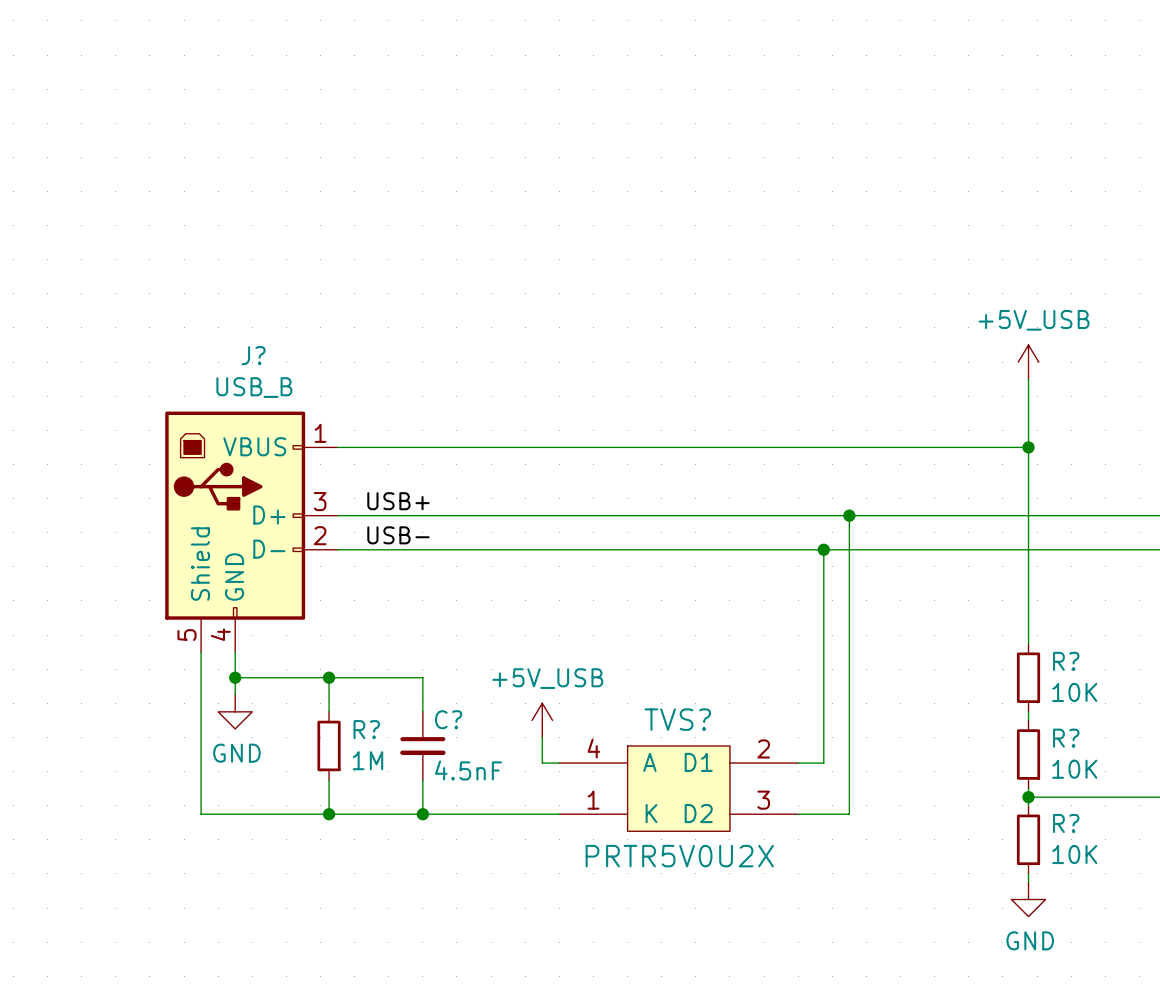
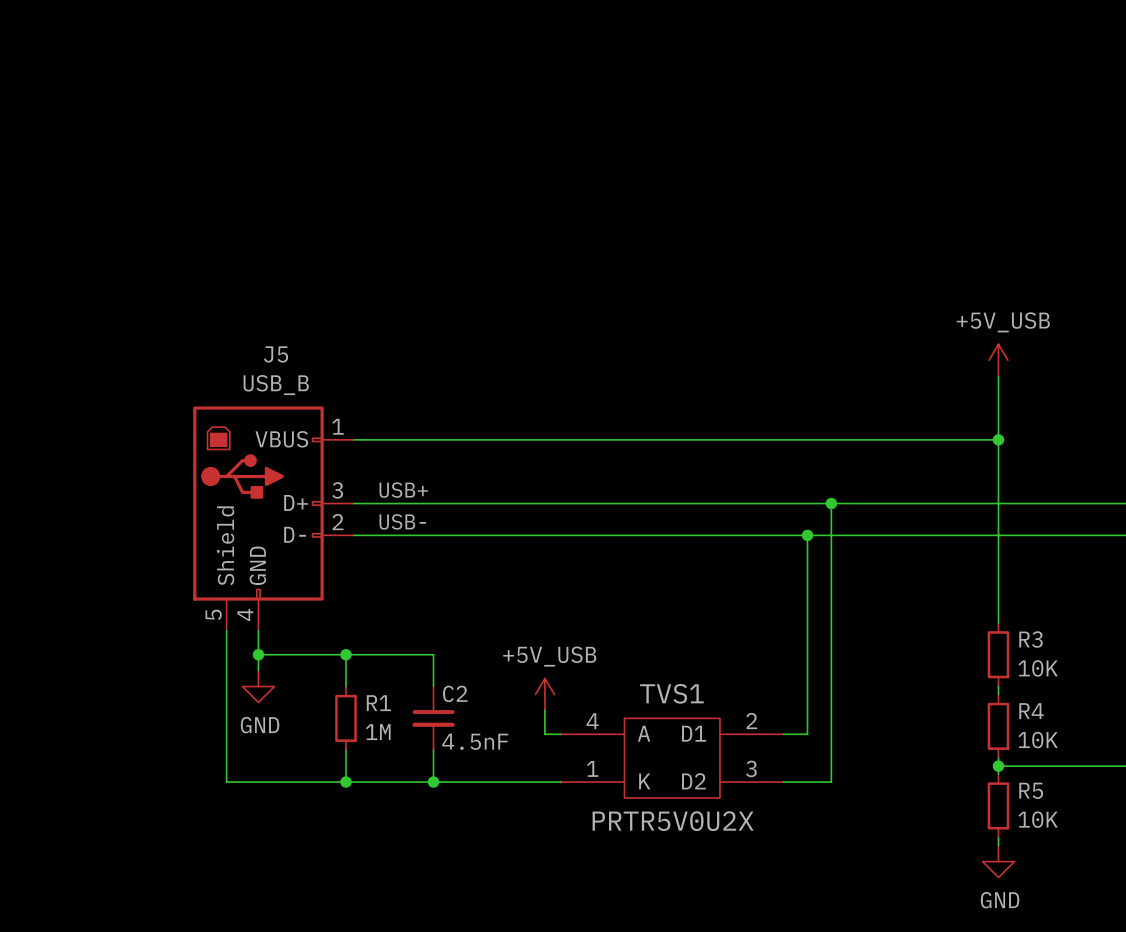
J? name: J? (253, 355) -> J5 (276, 354)
R? name: R? (1066, 661) -> R3 (1031, 639)
C? name: C? (448, 719) -> C2 (455, 693)
TVS? name: TVS? (677, 719) -> TVS1 (671, 693)
R? name: R? (366, 729) -> R1 (378, 703)
R? name: R? (1066, 738) -> R4 (1031, 711)
R? name: R? (1066, 823) -> R5 (1031, 790)

